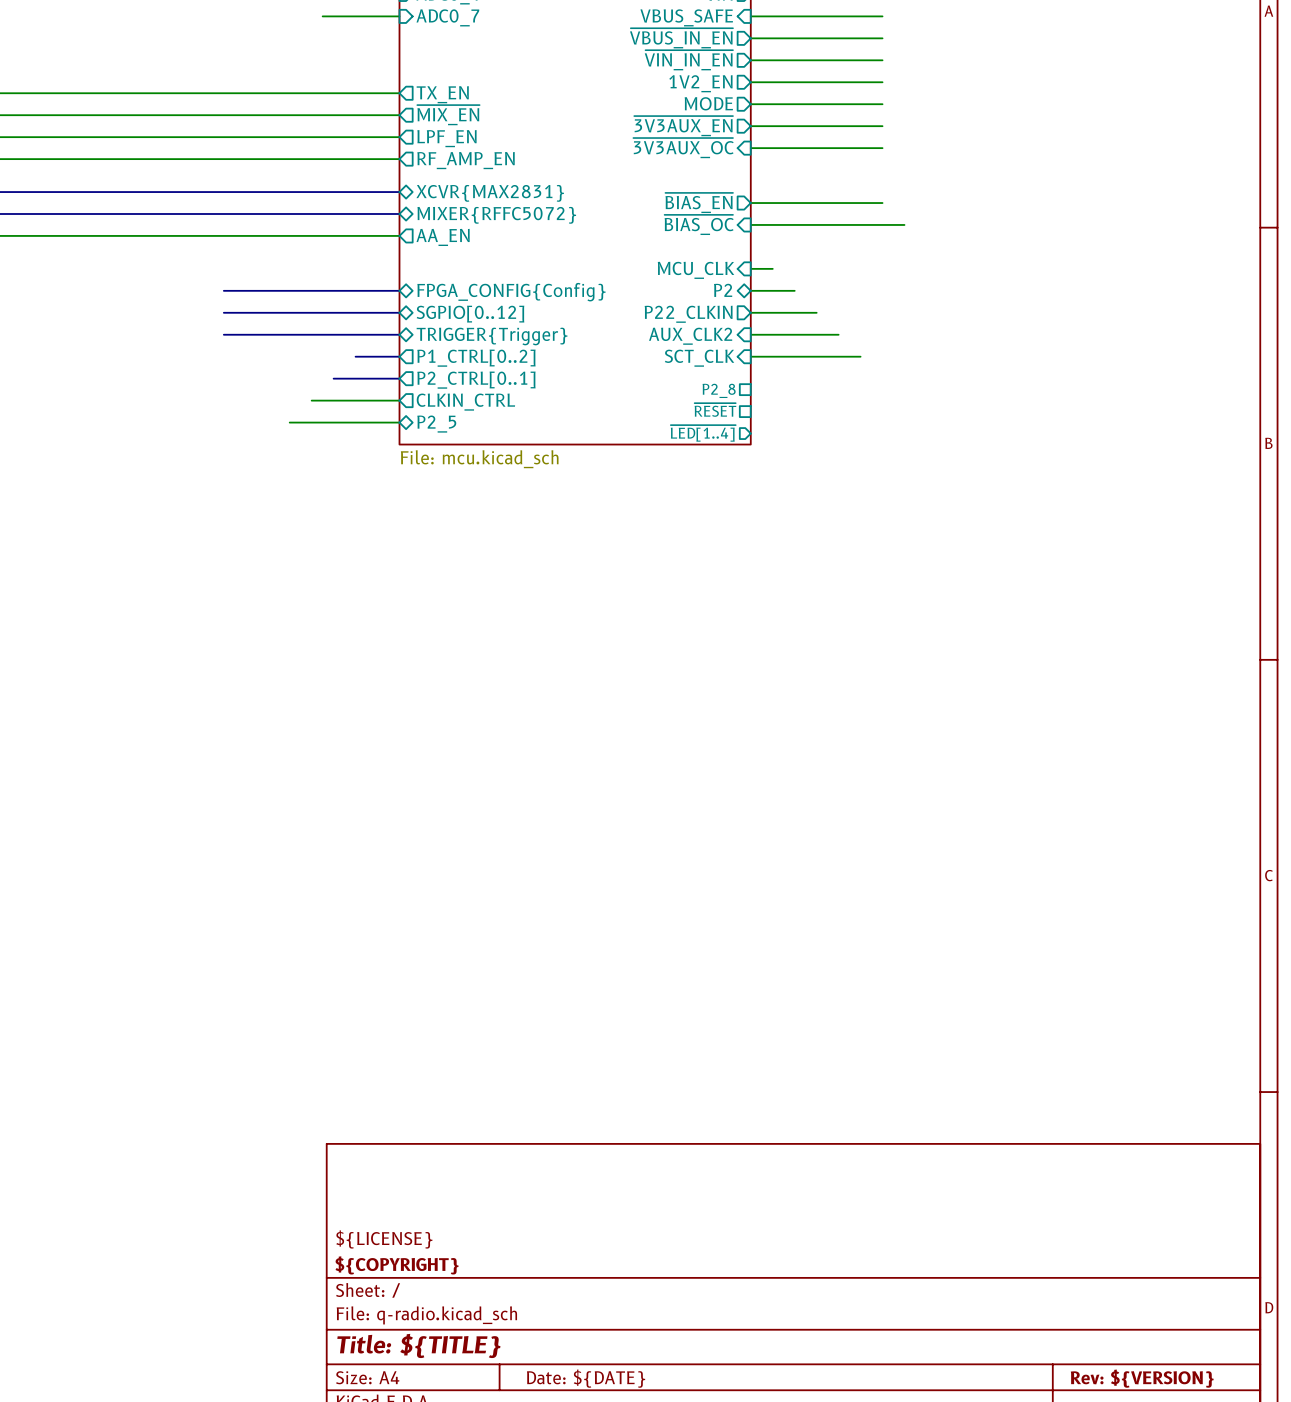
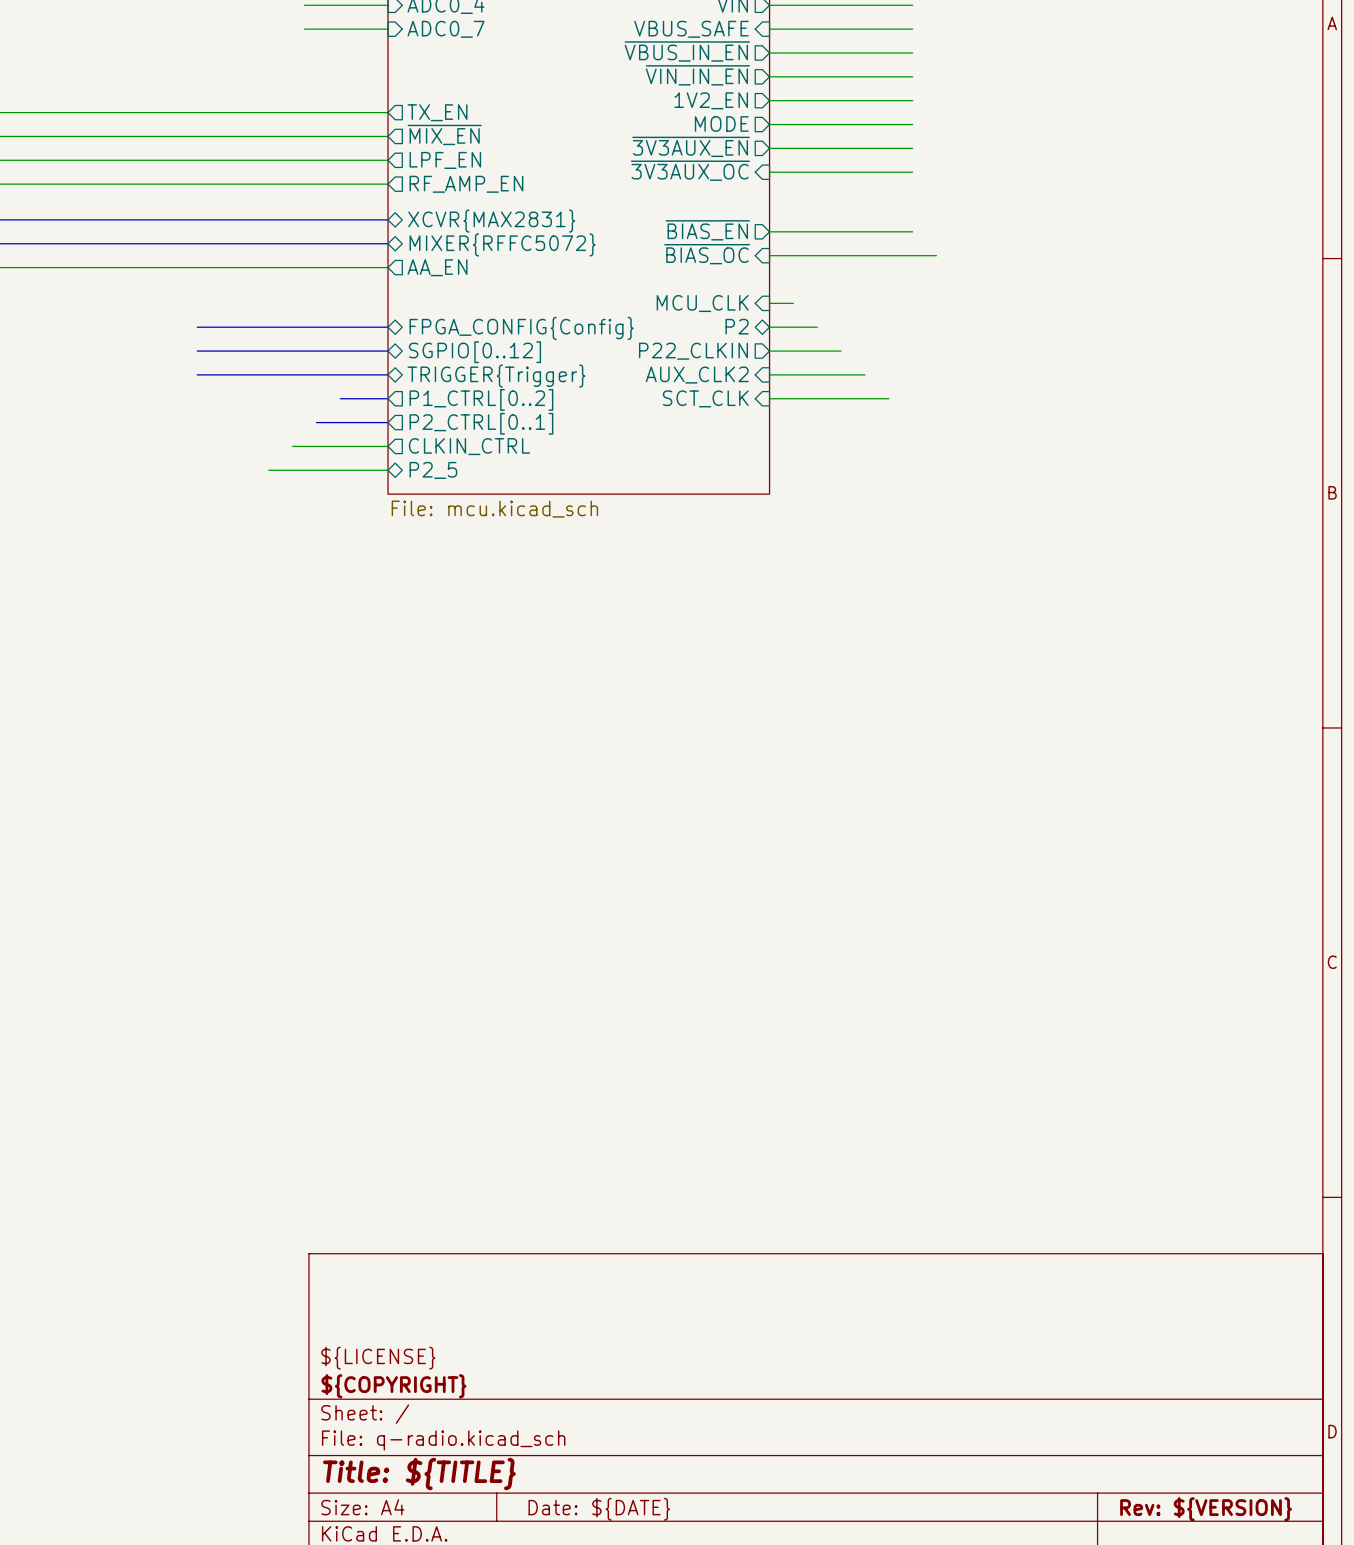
sheet pin: P2_8 (719, 390) -> none
sheet pin: ~{RESET} (715, 409) -> none
sheet pin: ~{LED[1..4]} (703, 433) -> none

